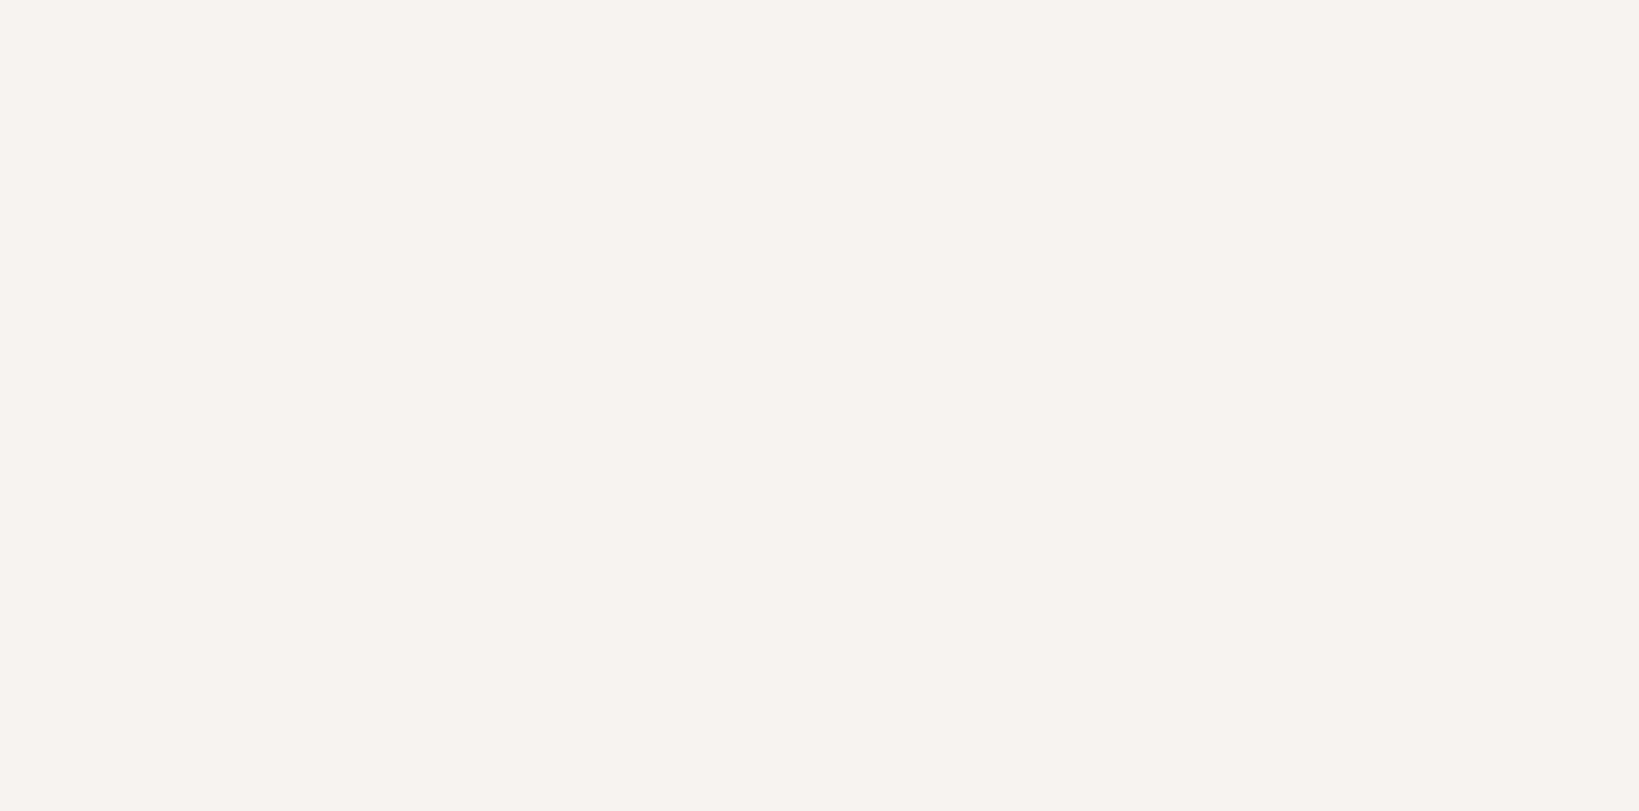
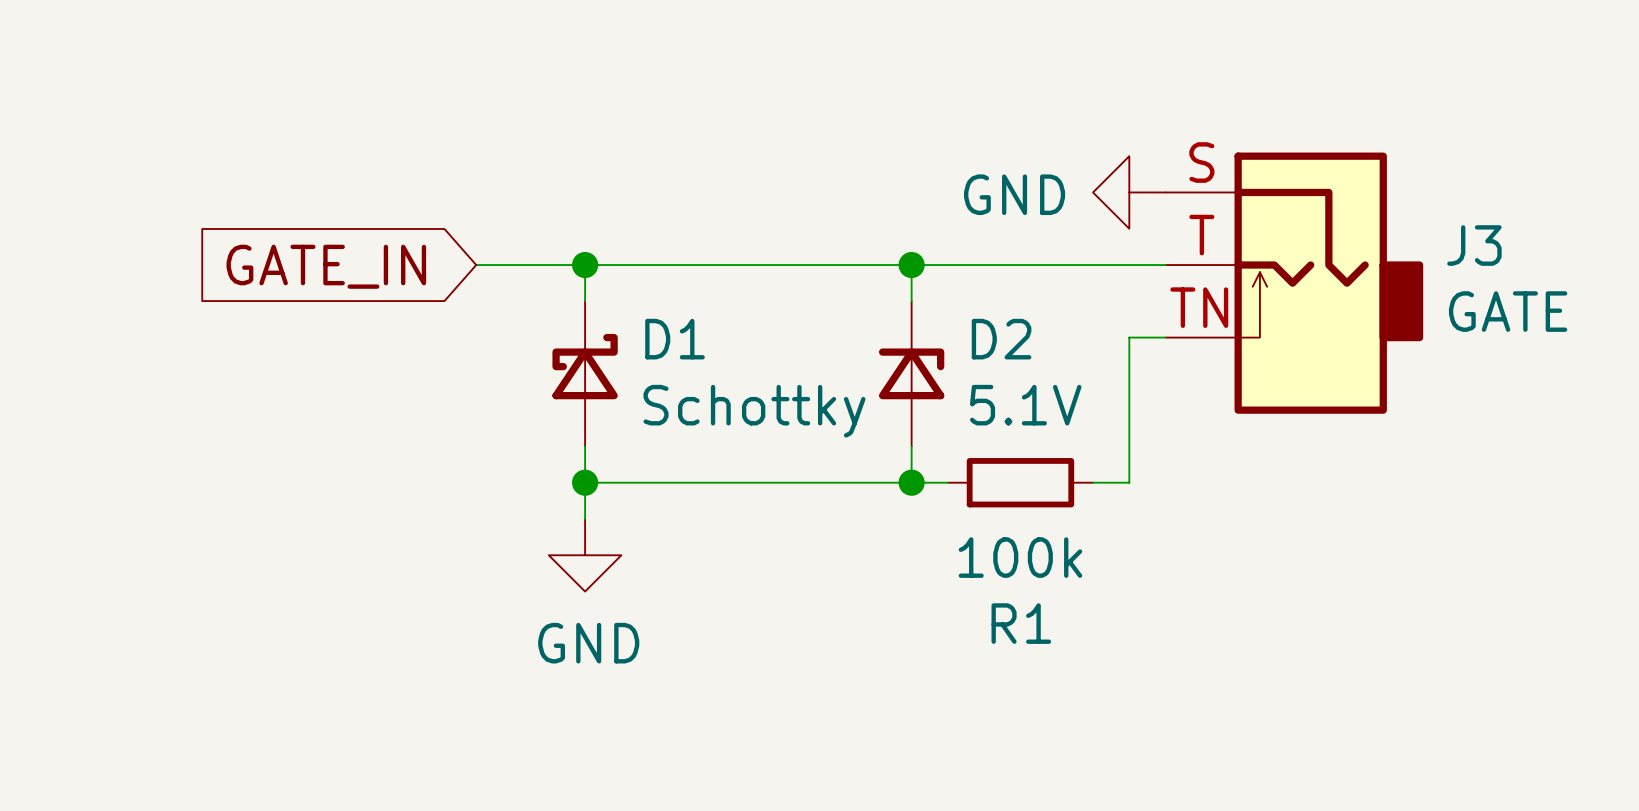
power symbol: none -> GND (1129, 192)
wire: none -> (476, 265) (1165, 265)
wire: none -> (585, 265) (585, 301)
junction: none -> (585, 265)
wire: none -> (911, 265) (911, 301)
junction: none -> (911, 265)
global label: none -> GATE_IN (326, 266)
J3: none -> GATE (1294, 283)
wire: none -> (1165, 337) (1129, 337) (1129, 482) (1093, 482)
D1: none -> Schottky (585, 373)
D2: none -> 5.1V (911, 373)
wire: none -> (585, 446) (585, 518)
wire: none -> (911, 446) (911, 482)
wire: none -> (585, 482) (947, 482)
junction: none -> (585, 482)
junction: none -> (911, 482)
R1: none -> 100k (1020, 482)
power symbol: none -> GND (585, 555)

